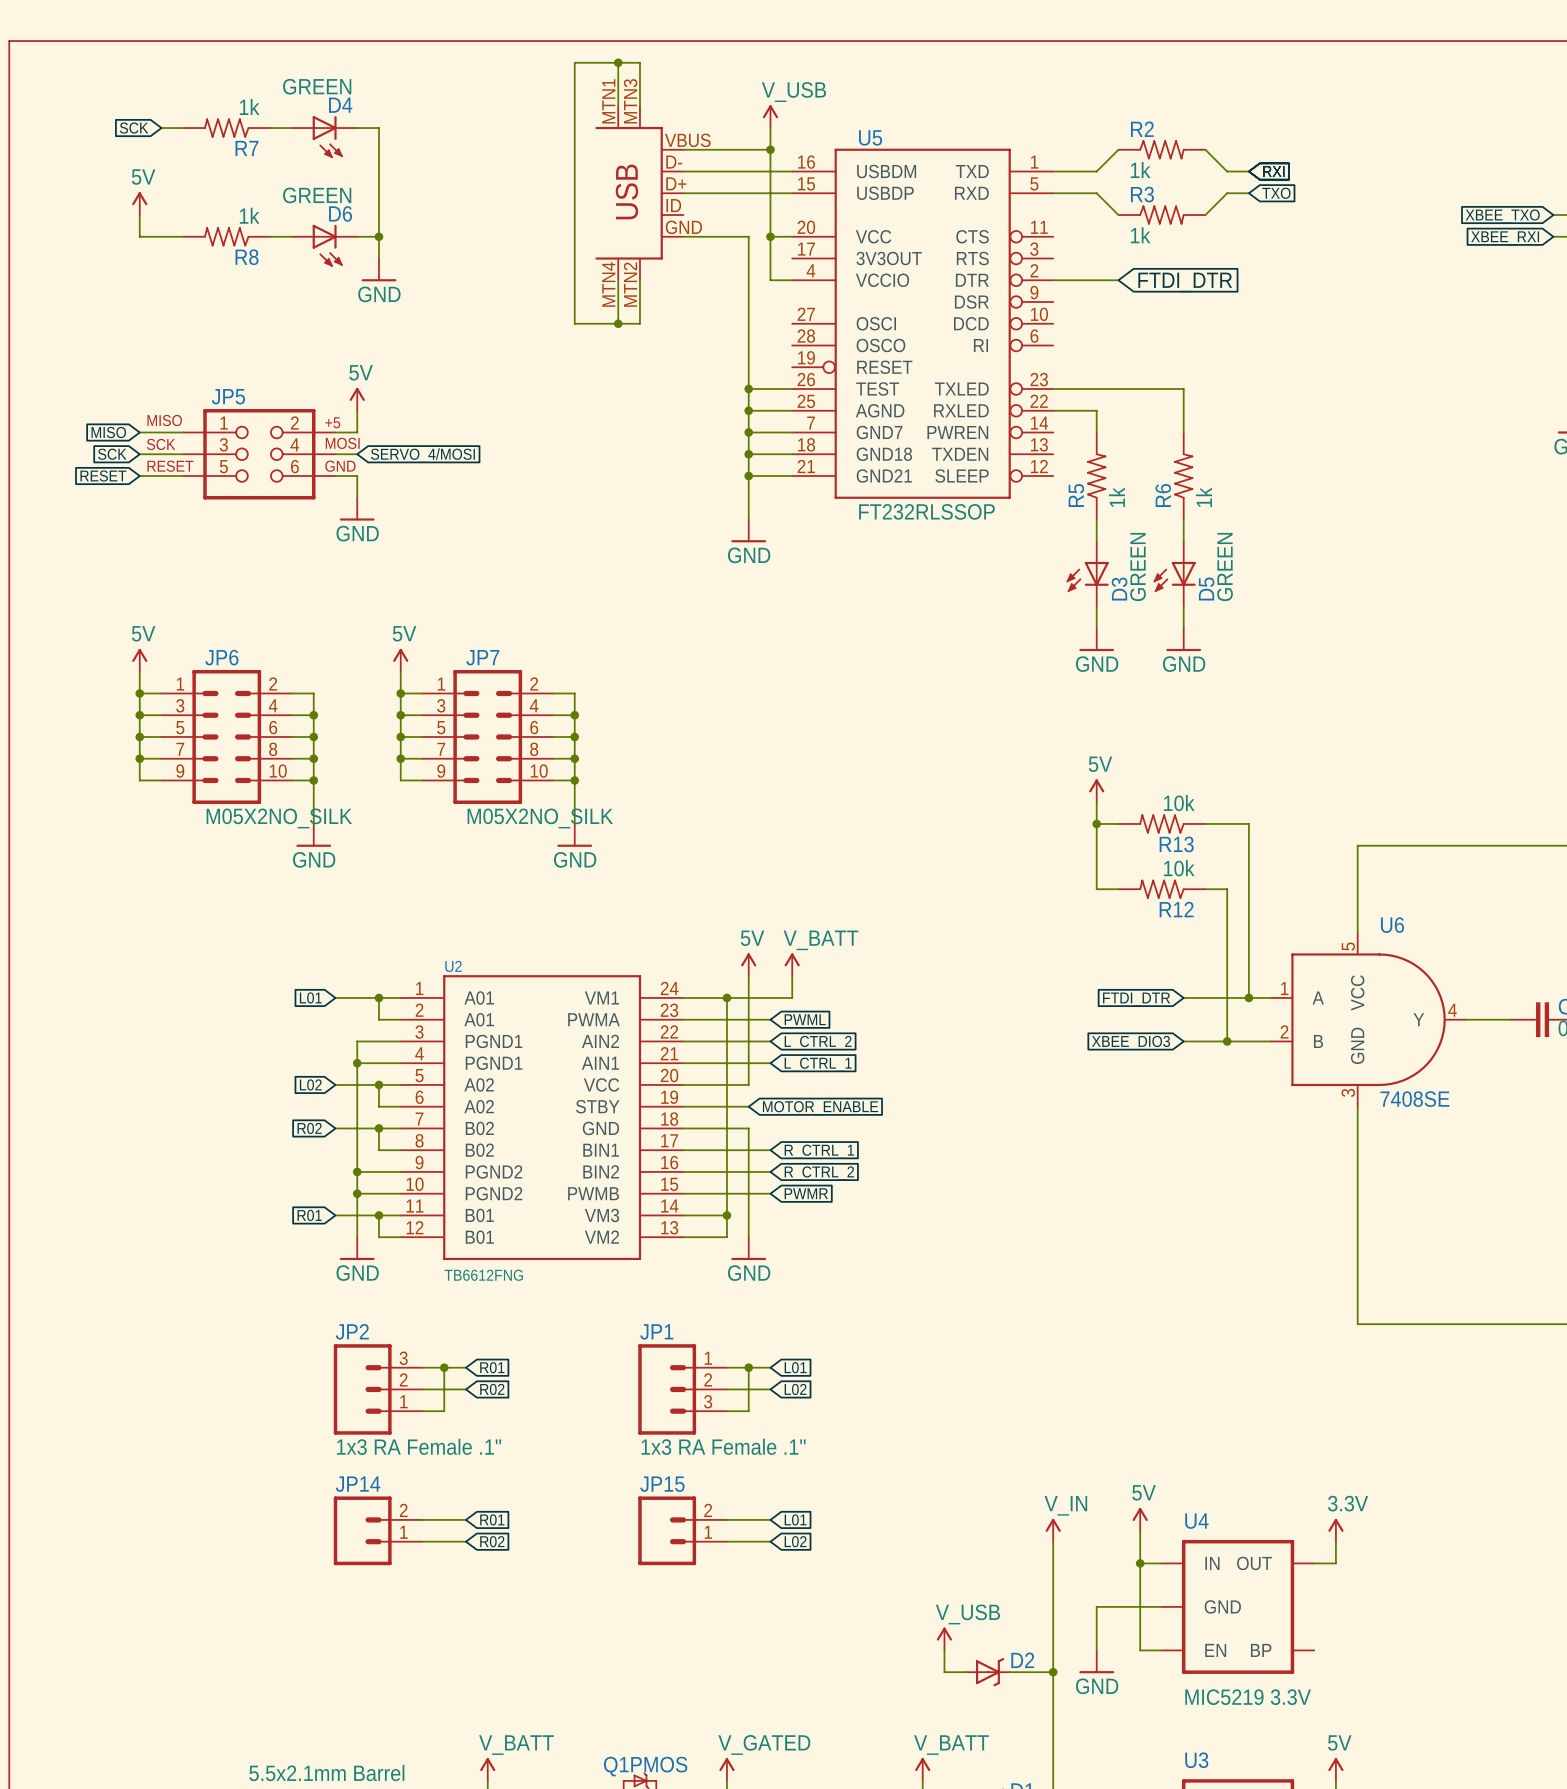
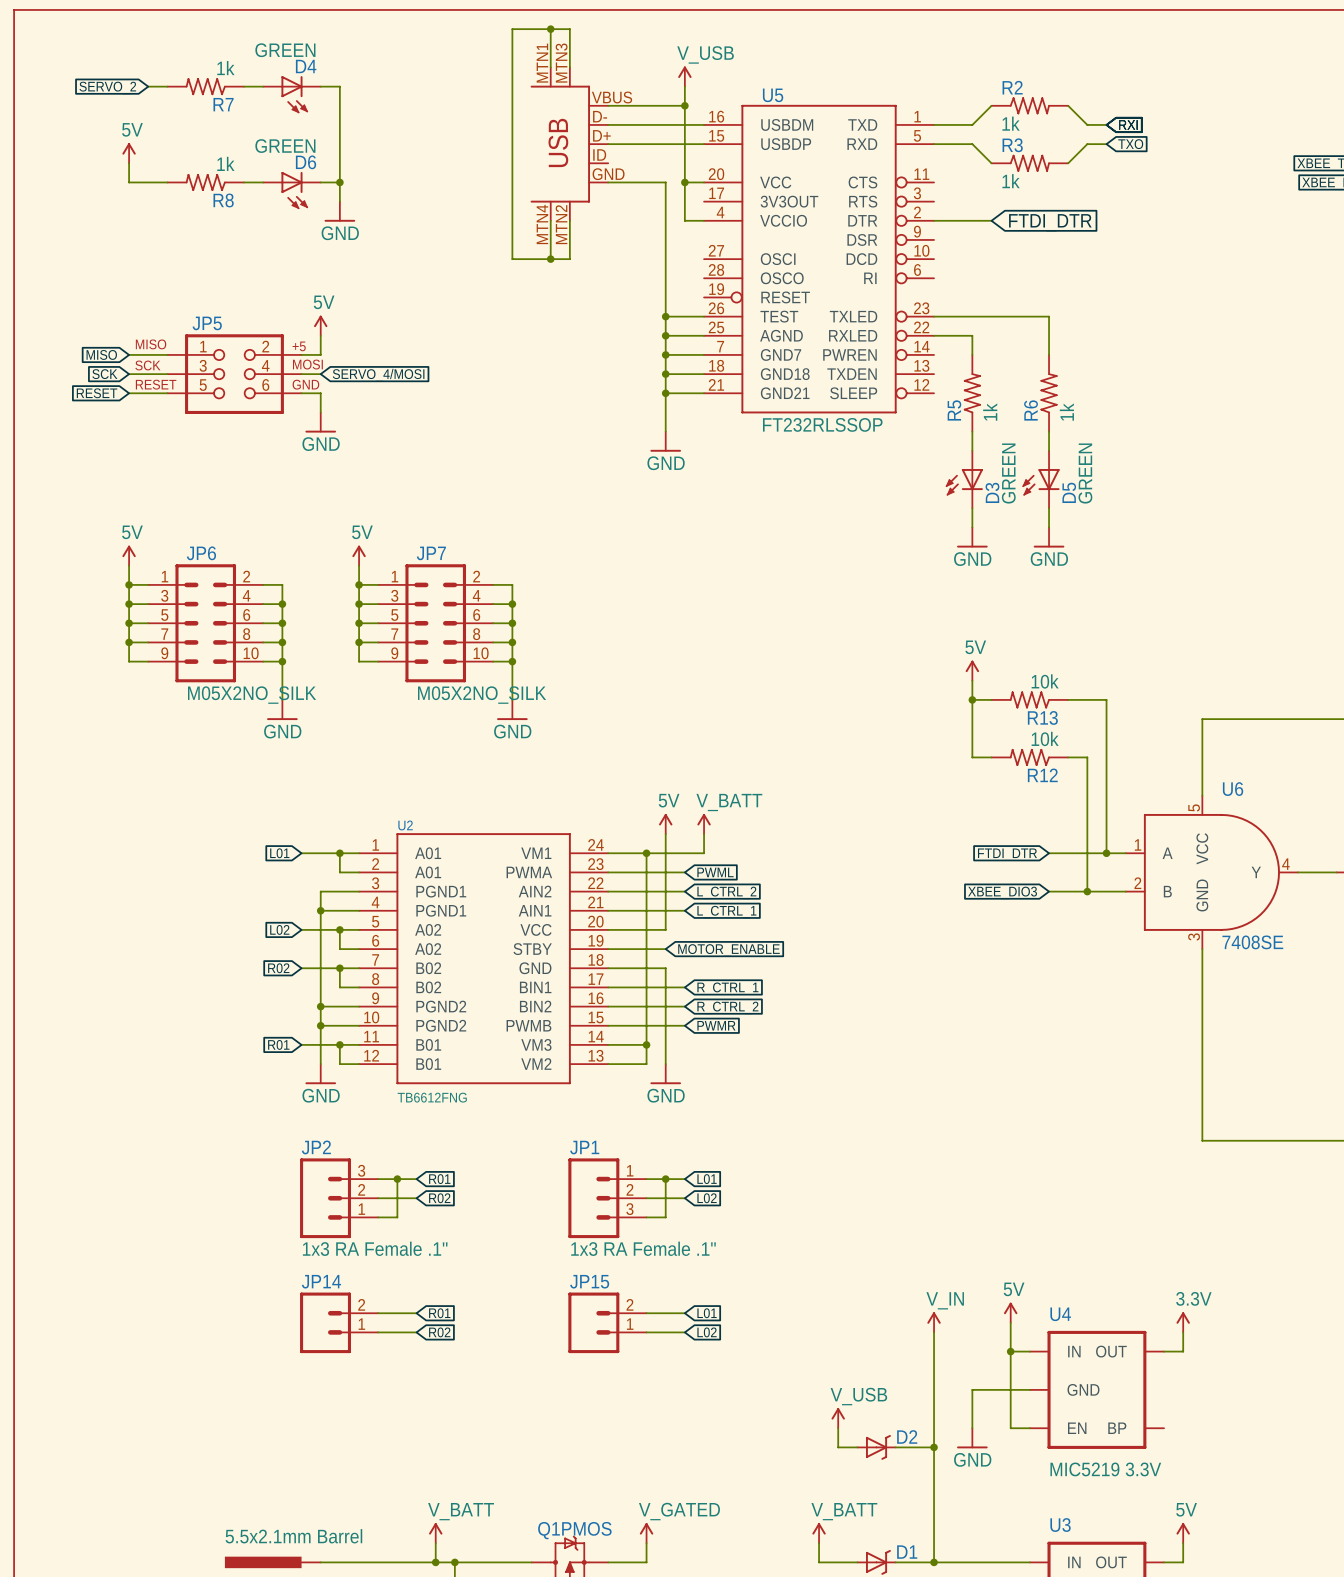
global label: SCK (134, 128) -> SERVO_2 (107, 87)

